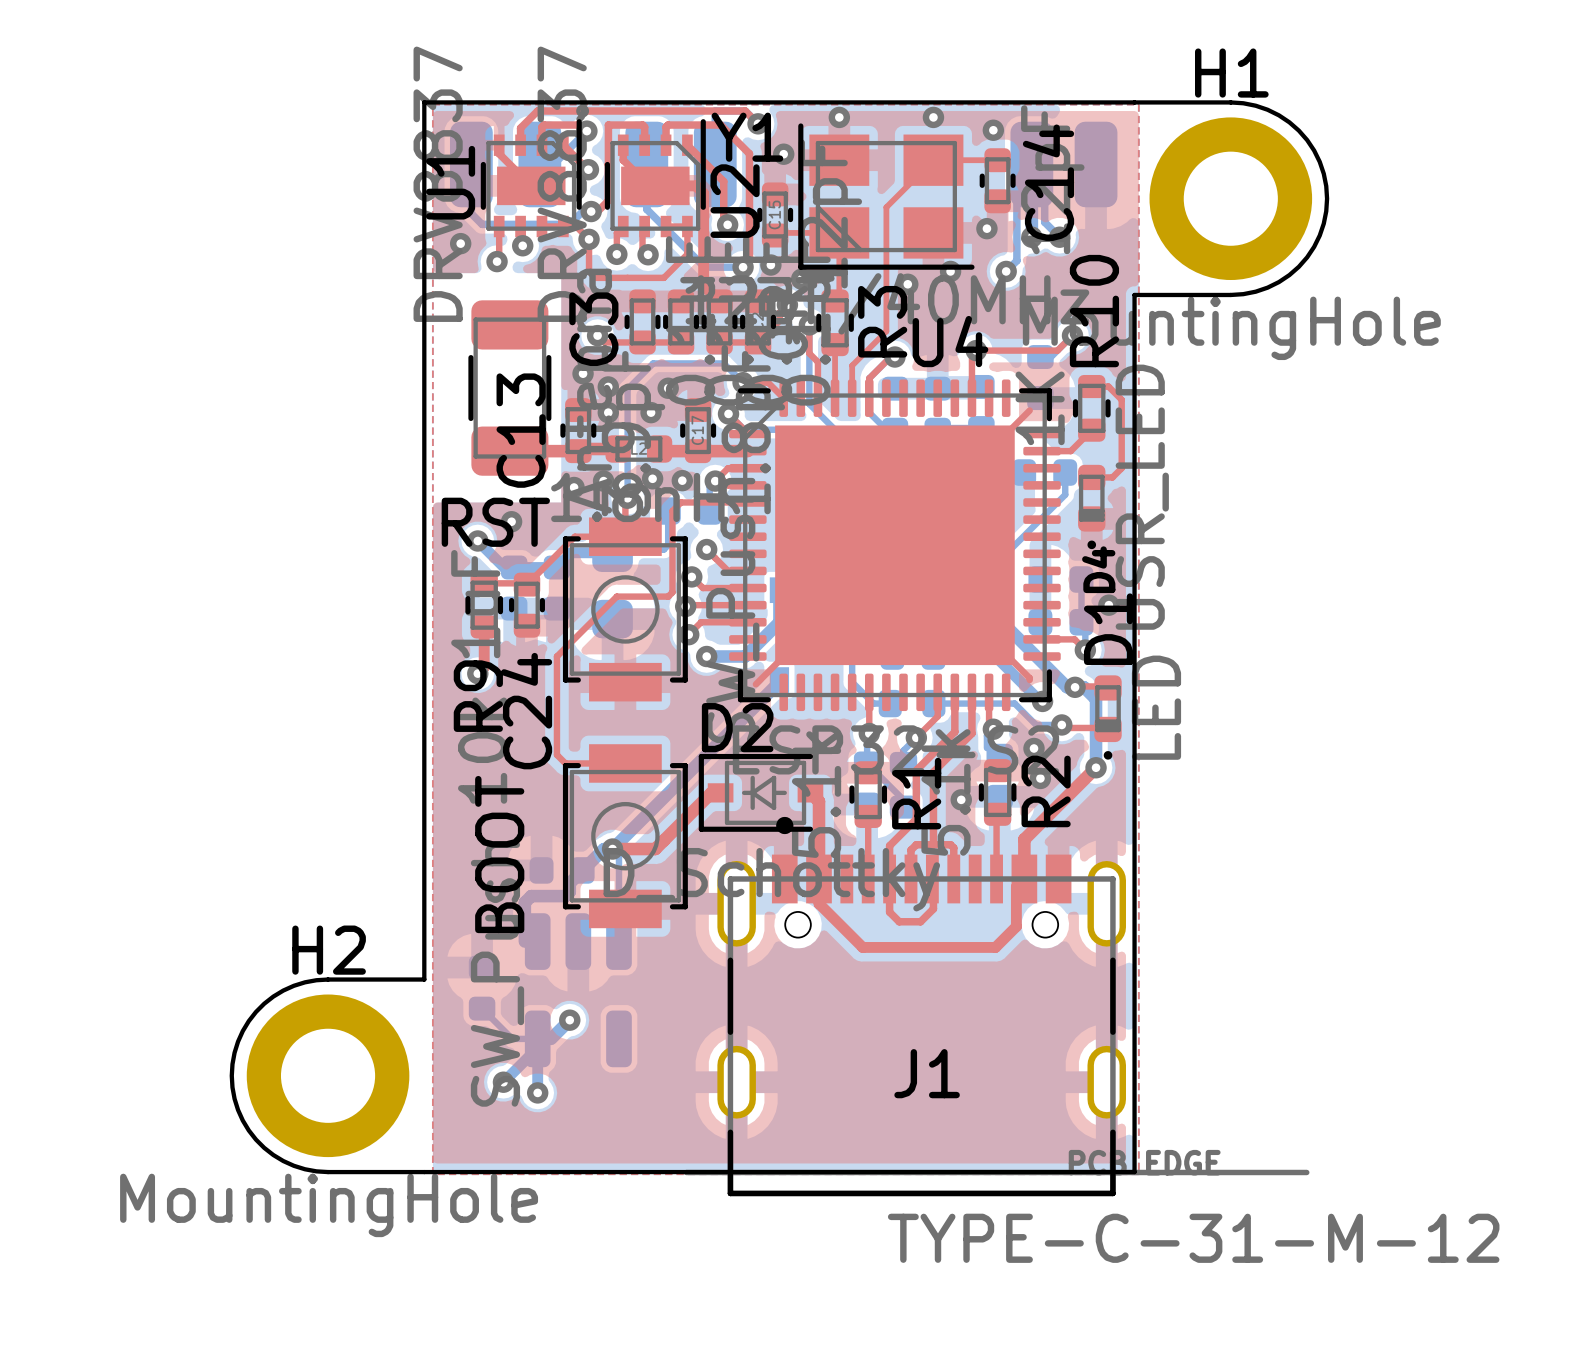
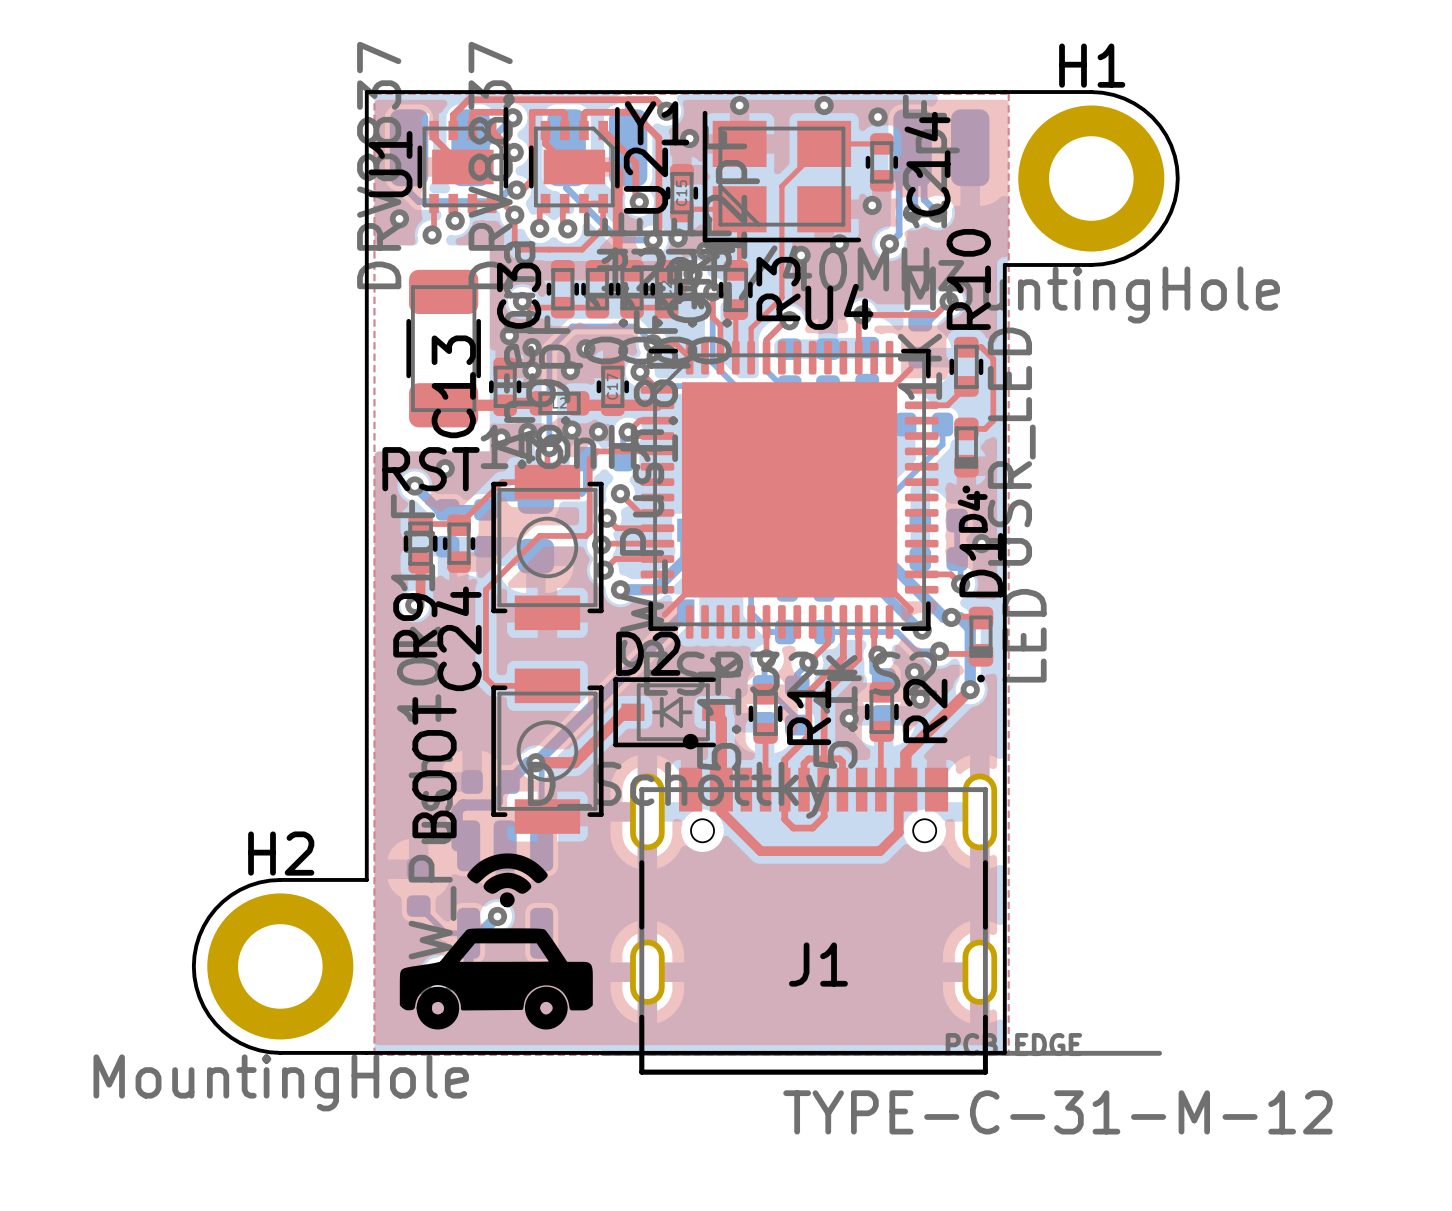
drawing: none -> [399, 853, 593, 1030]

